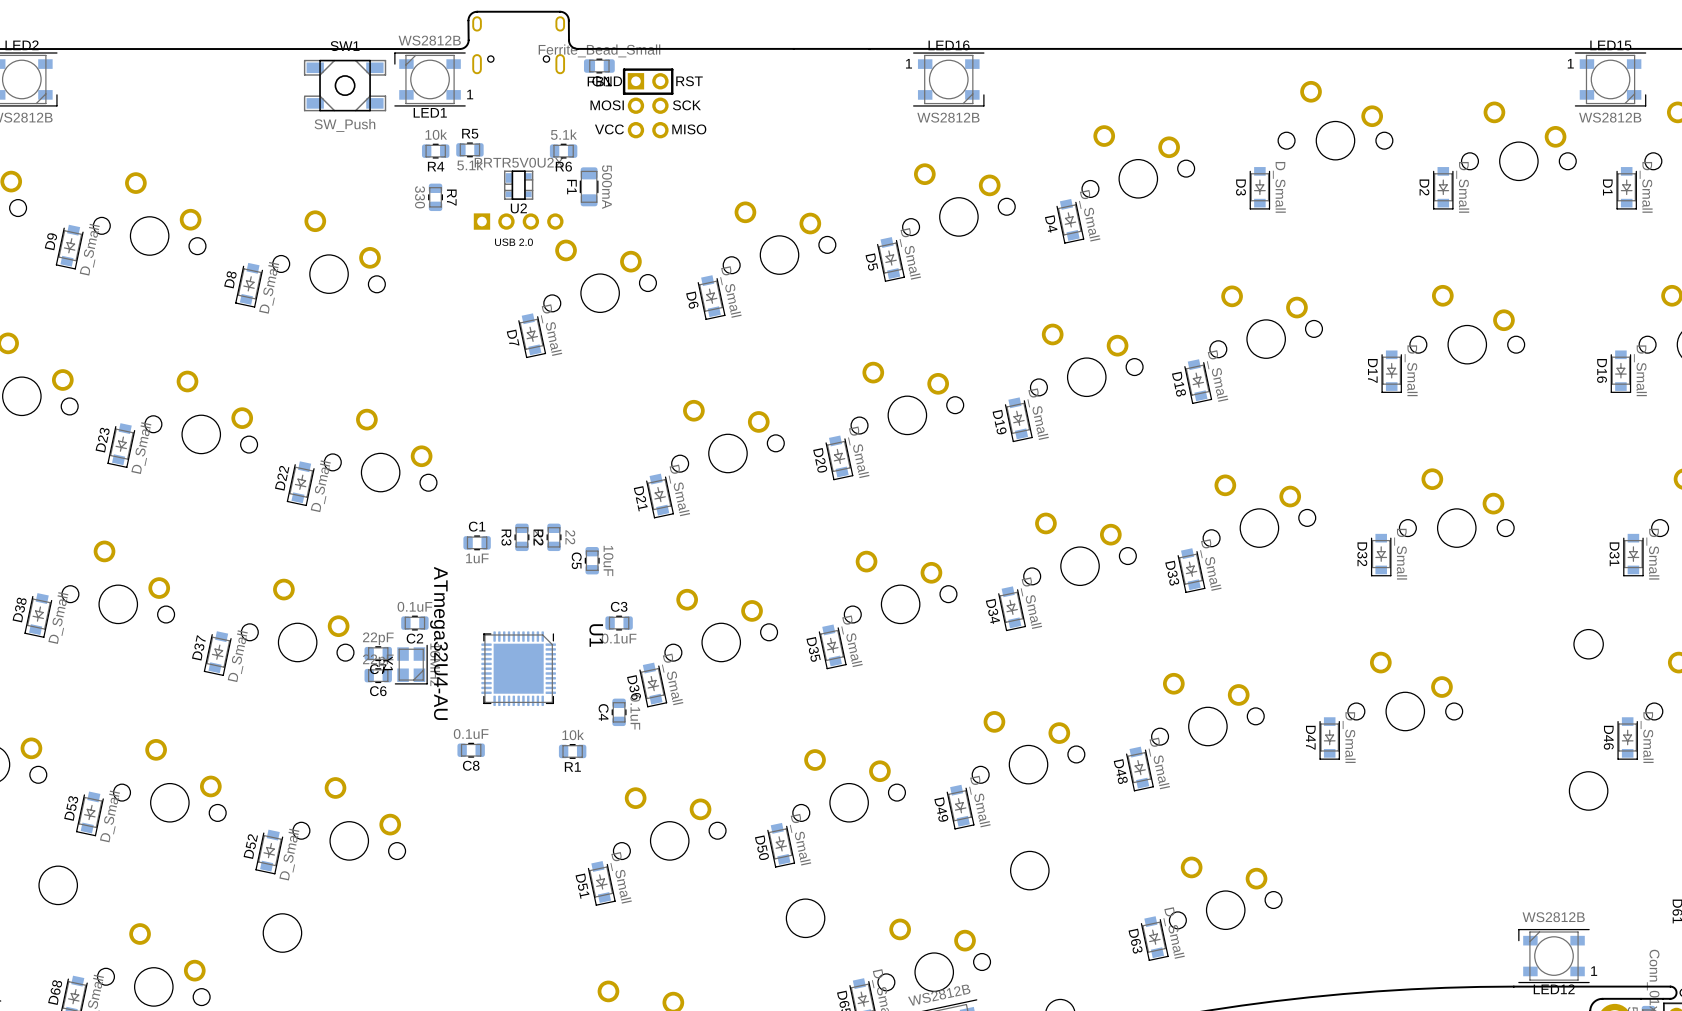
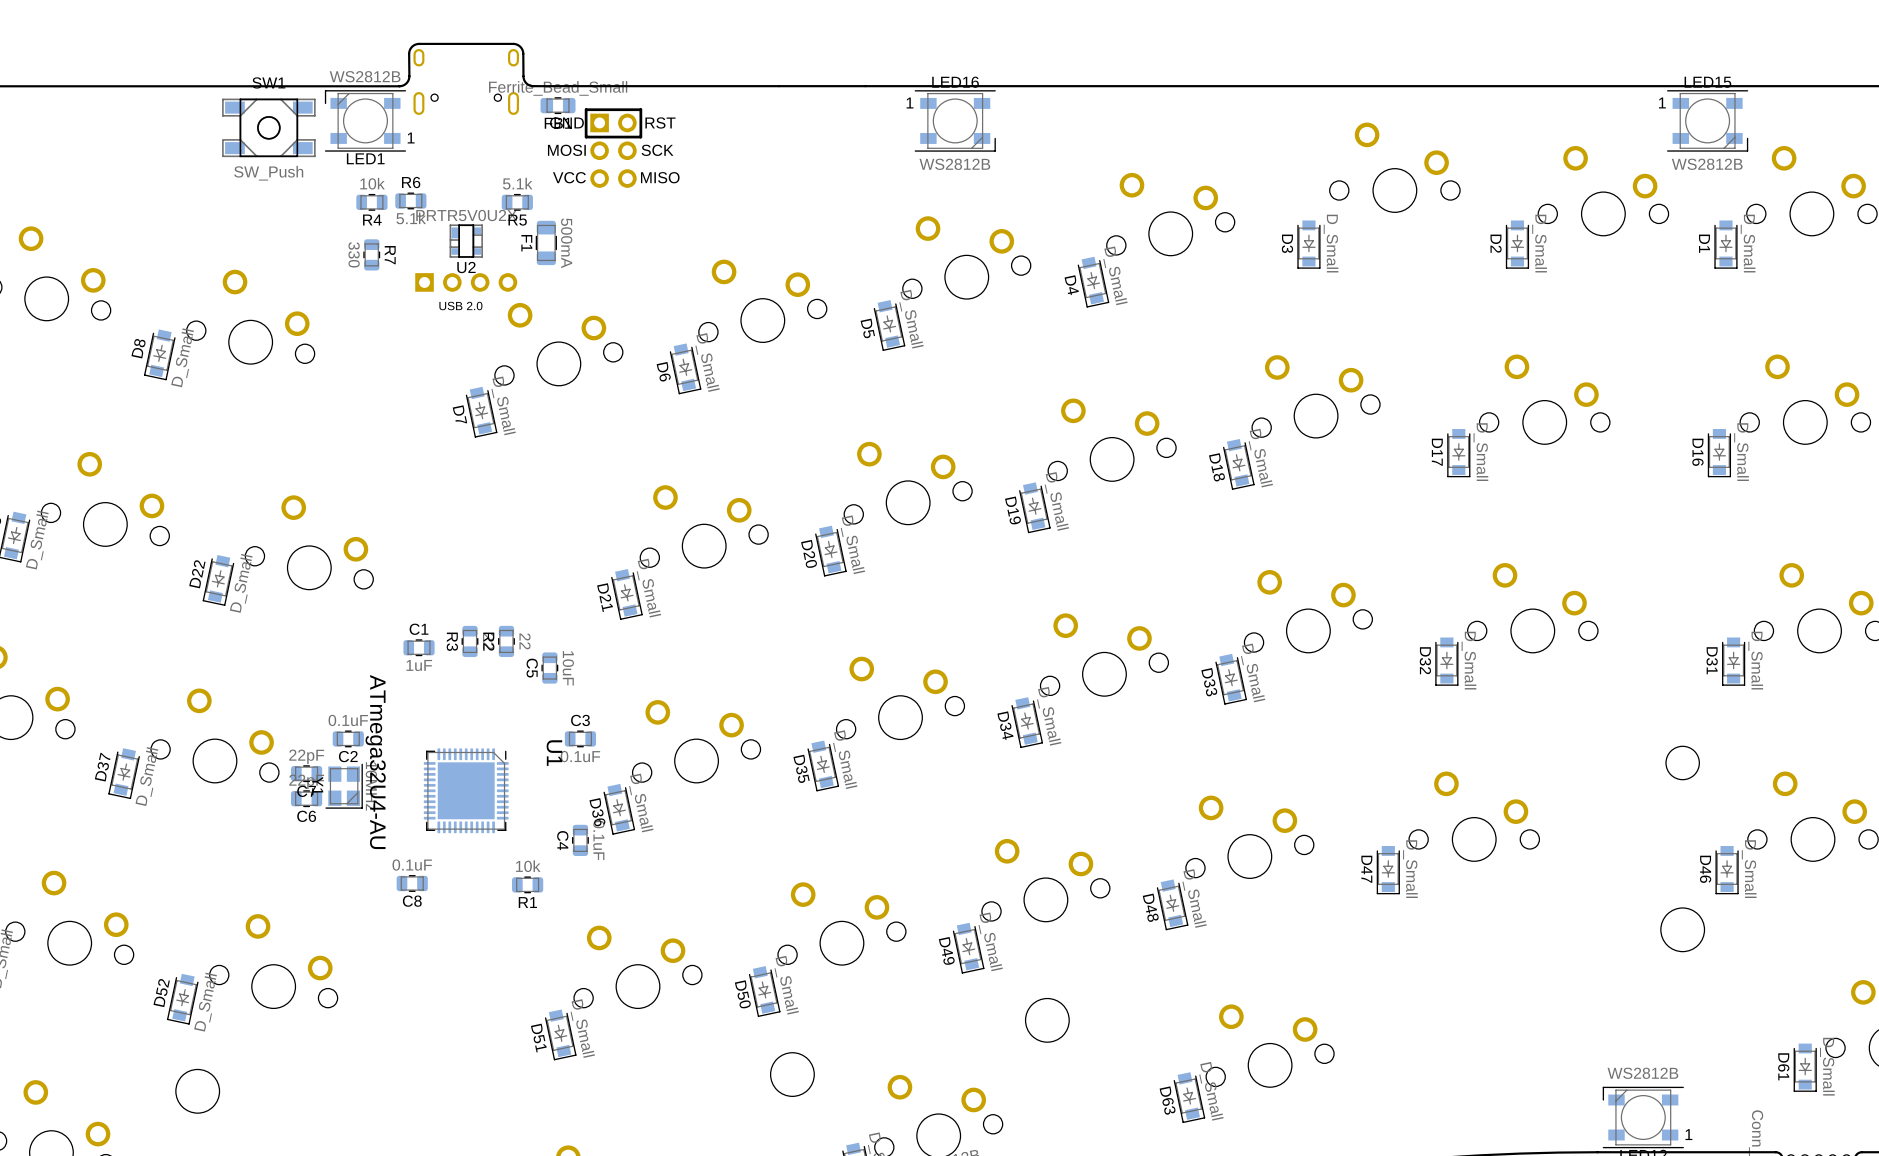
R5 name: R5 (470, 133) -> R6 (411, 182)
R6 name: R6 (563, 166) -> R5 (517, 220)

